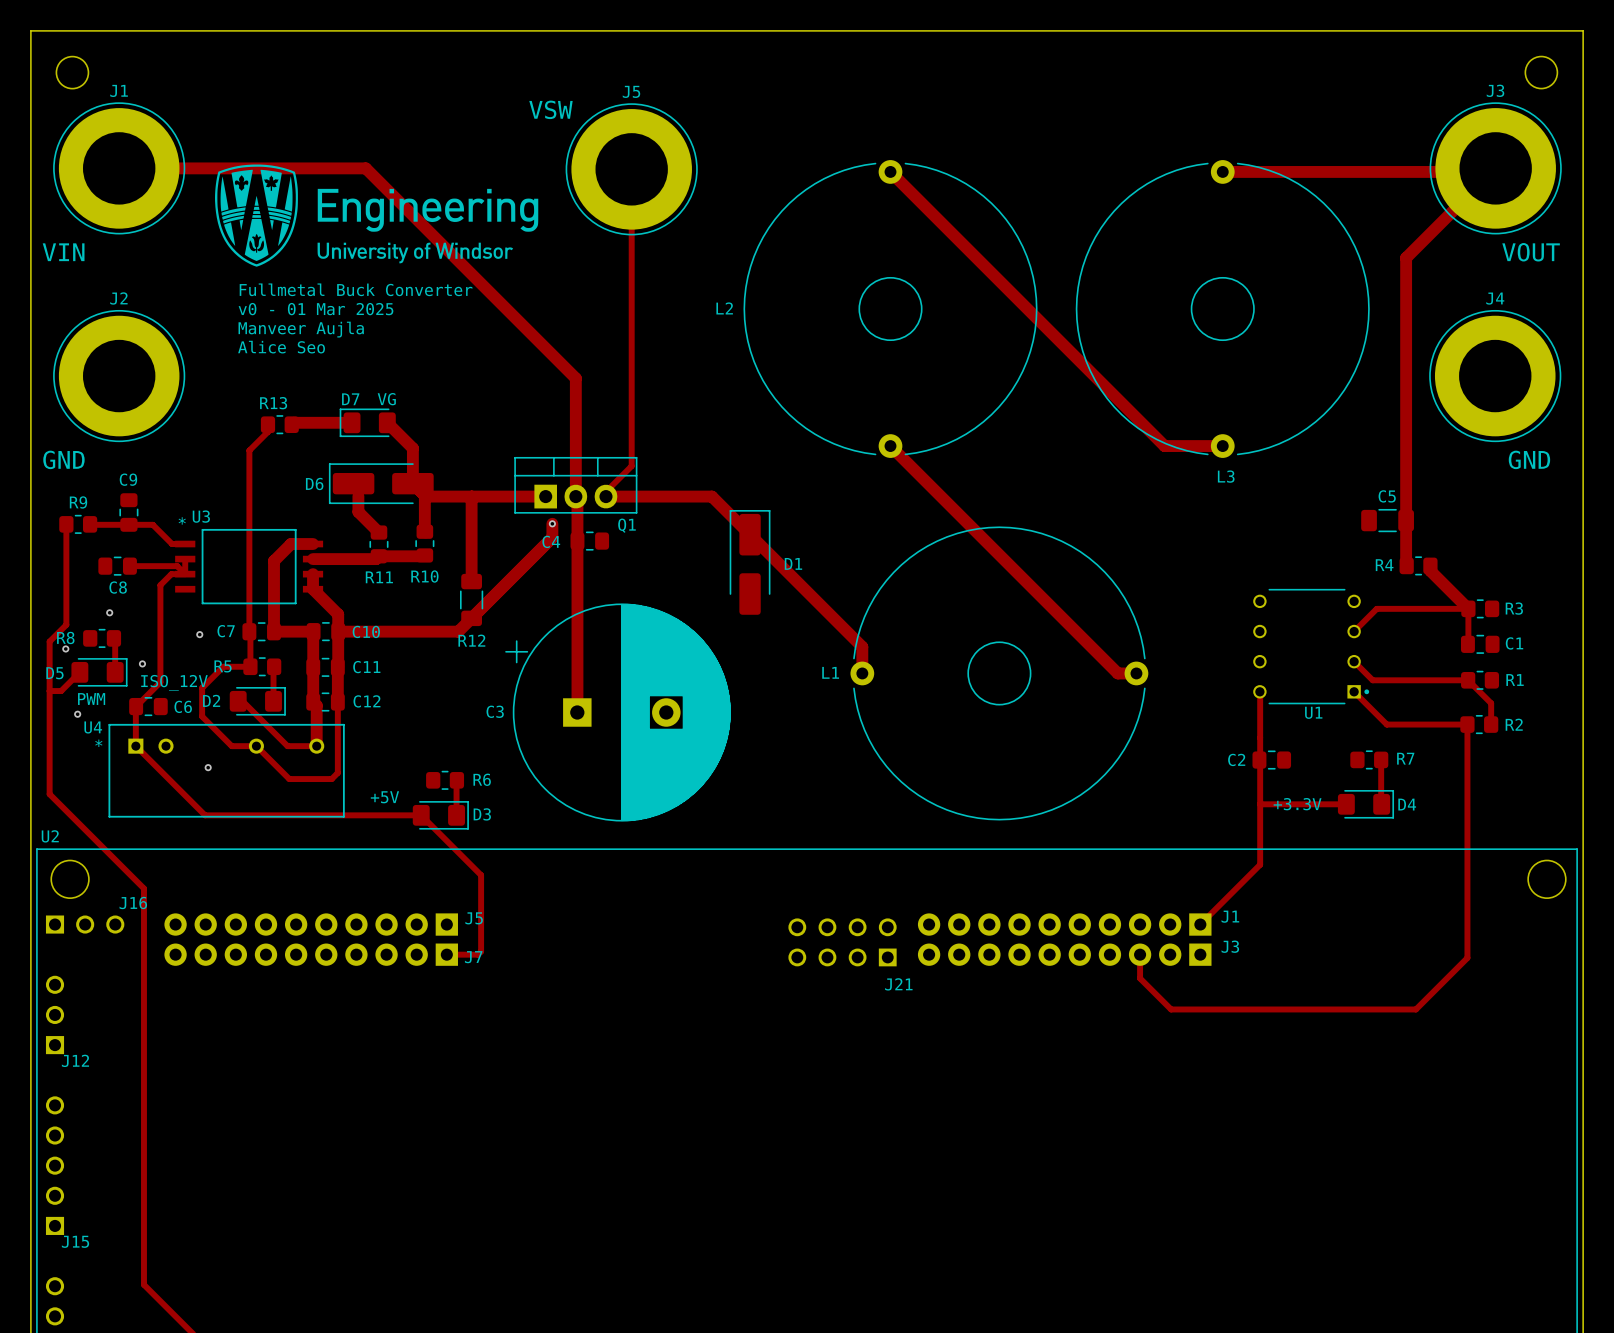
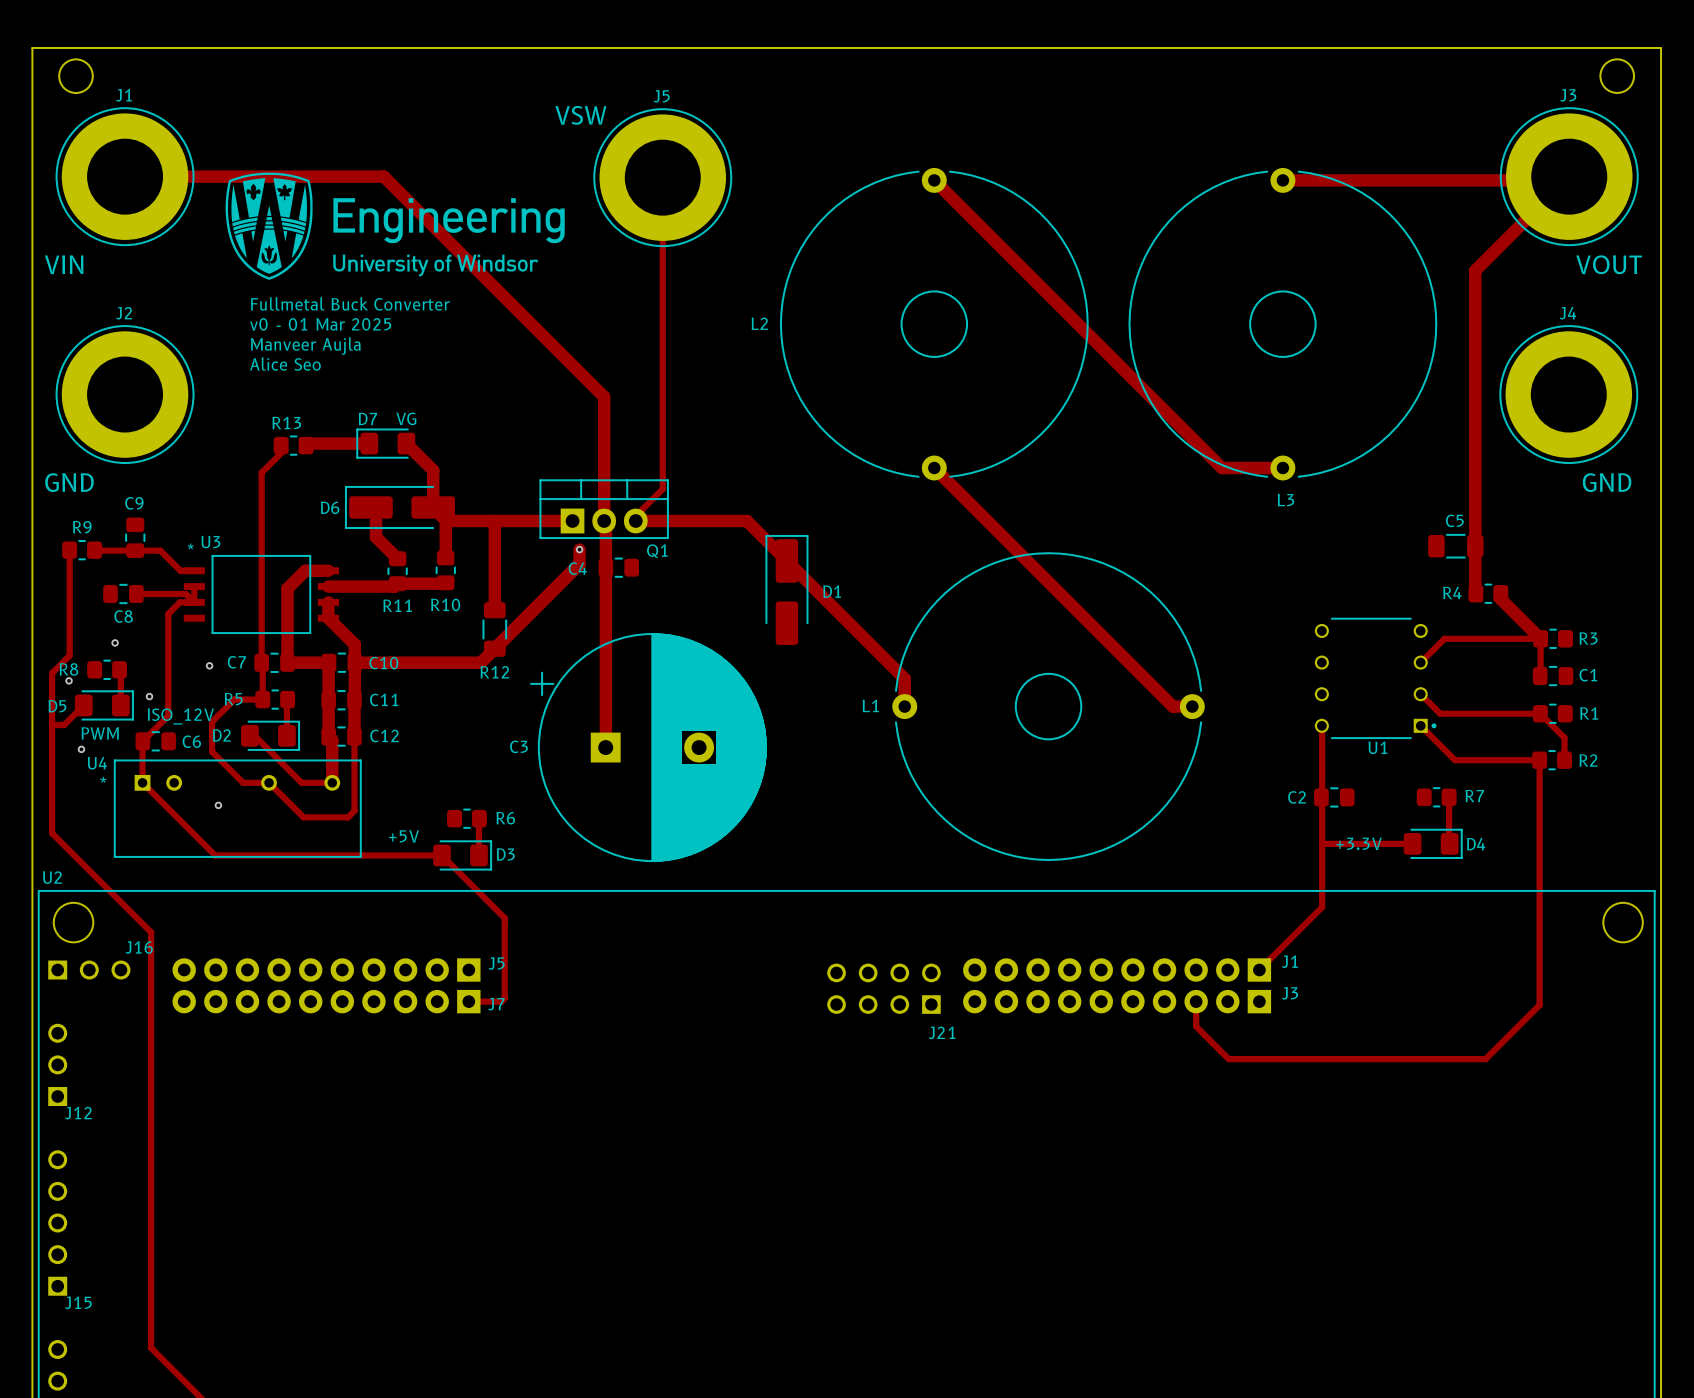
board edge: (30, 45) (30, 30) (1583, 30) (1583, 45) -> (32, 47) (1661, 47)

